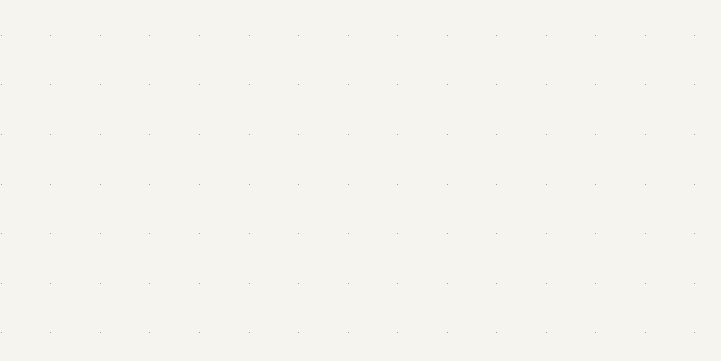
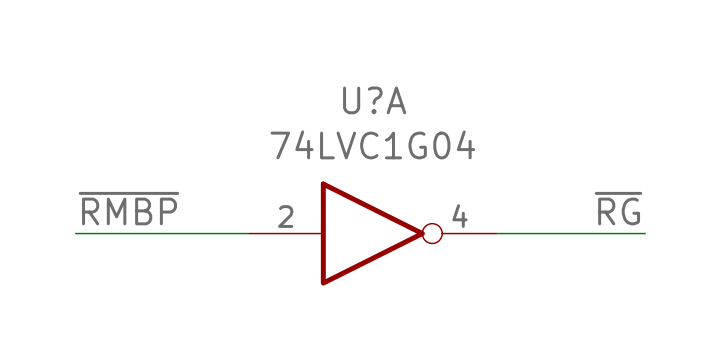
label: none -> ~{RMBP} (128, 208)
label: none -> ~{RG} (618, 208)
wire: none -> (75, 233) (249, 233)
U?A: none -> 74LVC1G04 (372, 233)
wire: none -> (496, 233) (645, 233)

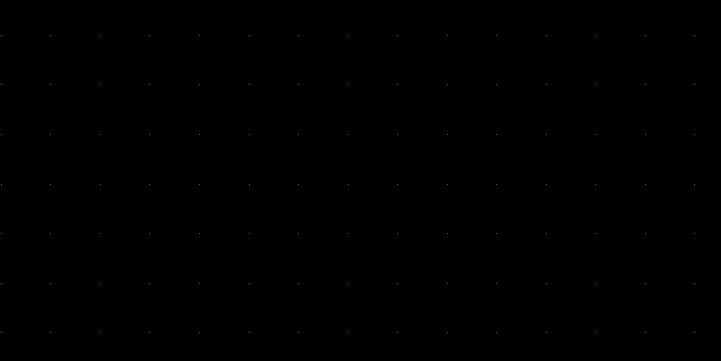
label: ~{RMBP} (128, 208) -> none
label: ~{RG} (618, 208) -> none
wire: (75, 233) (249, 233) -> none
U?A: 74LVC1G04 (372, 233) -> none
wire: (496, 233) (645, 233) -> none

